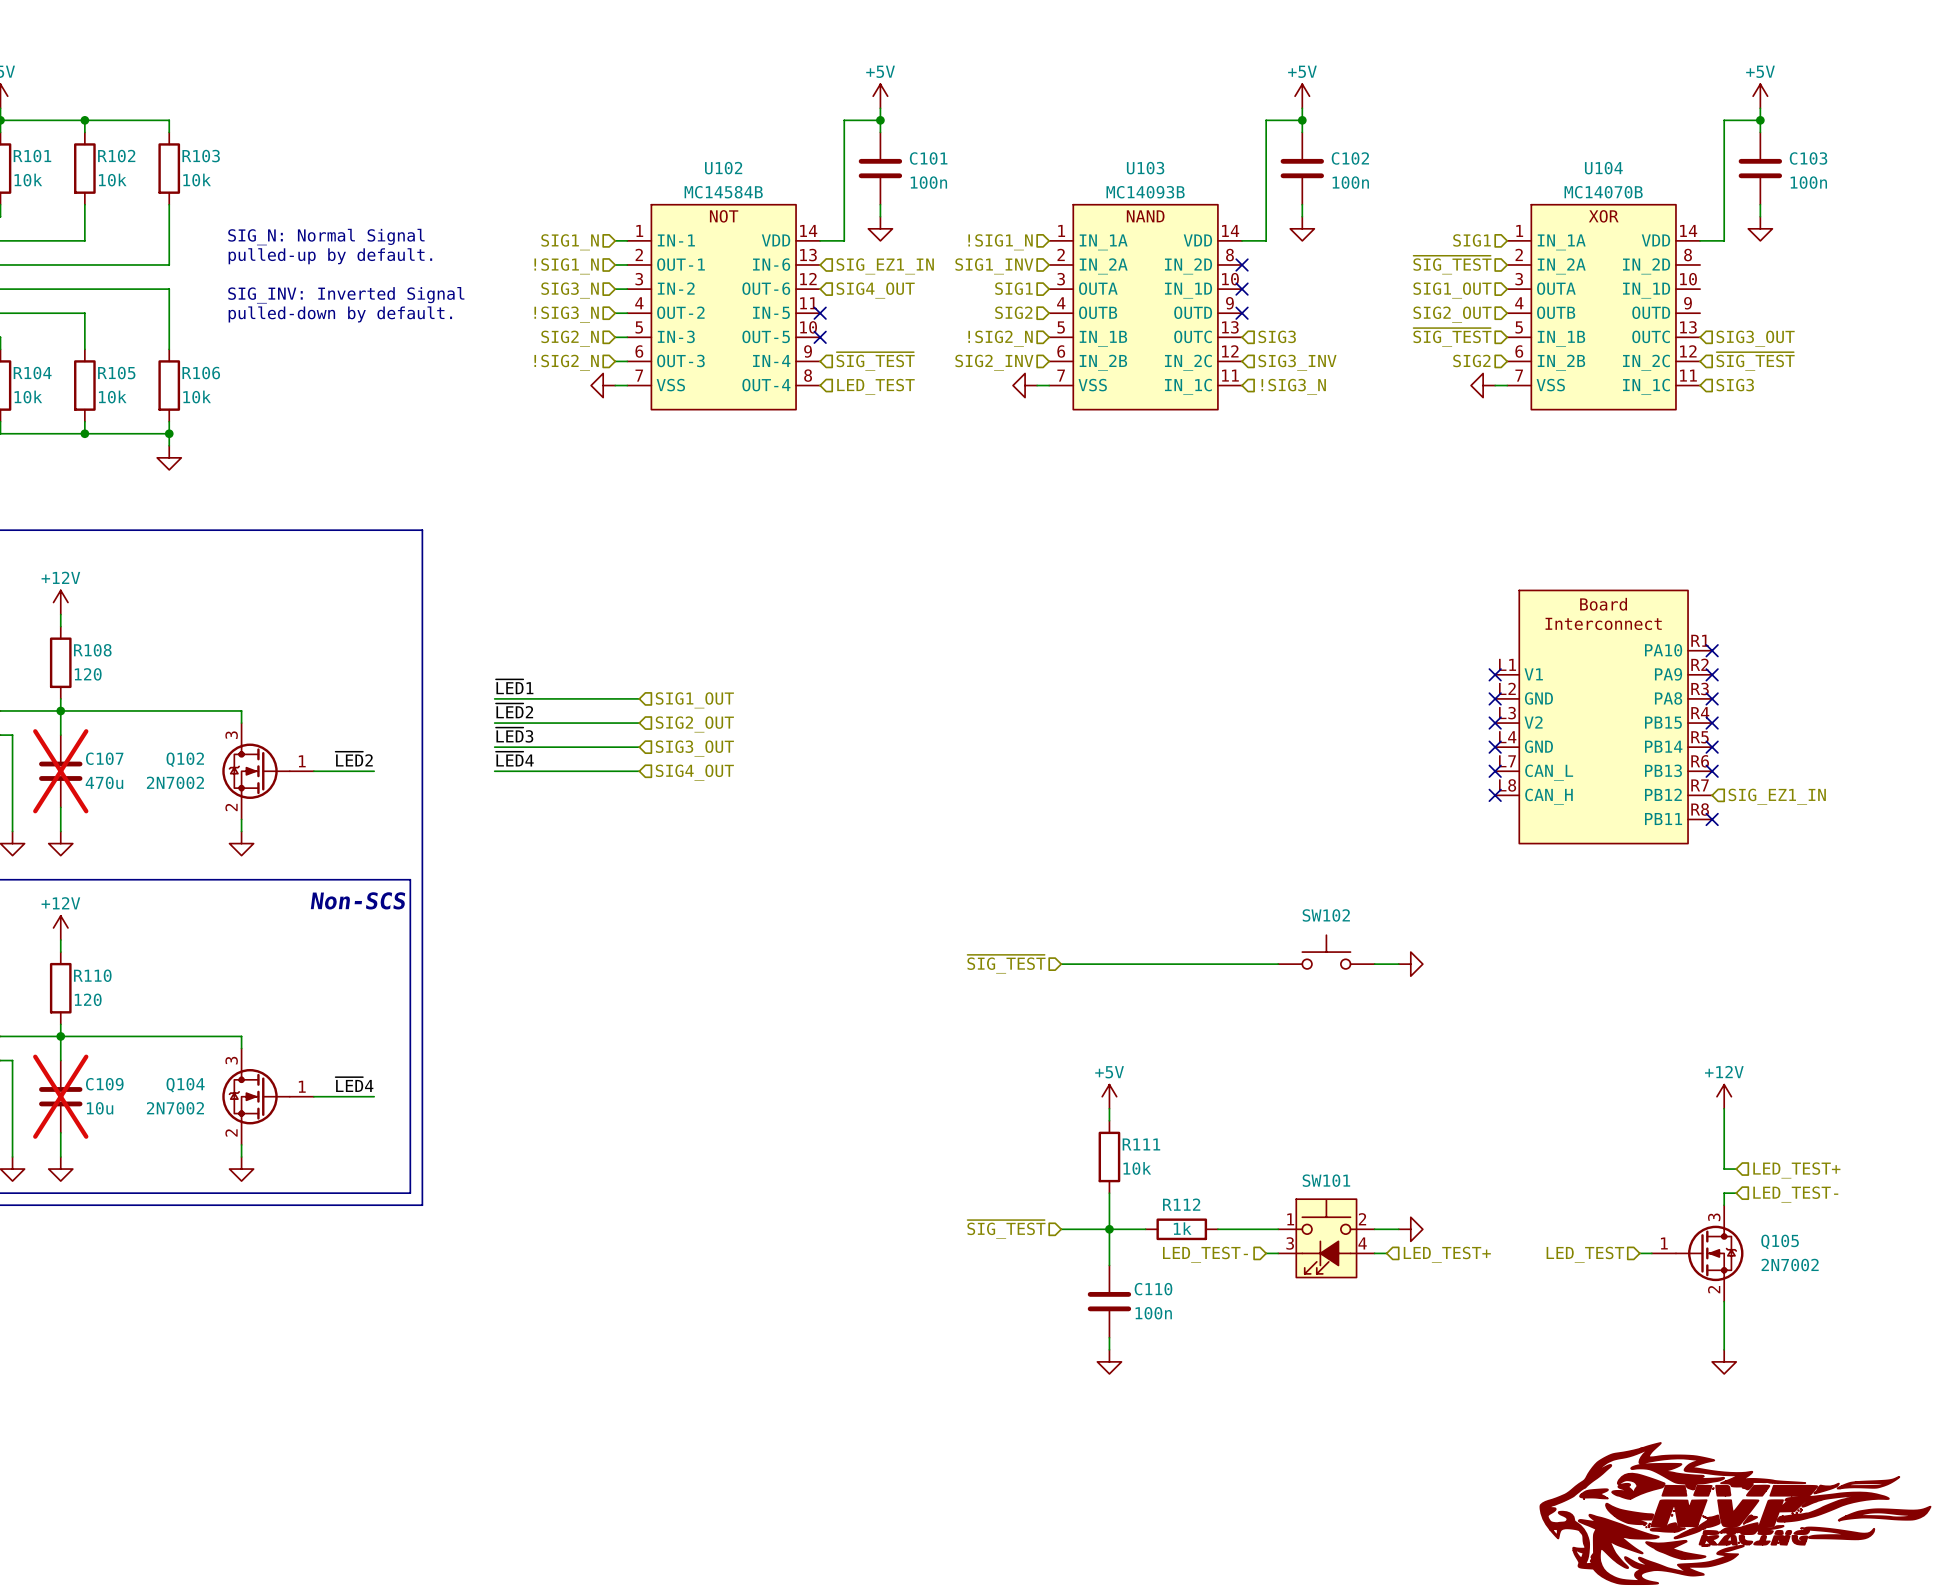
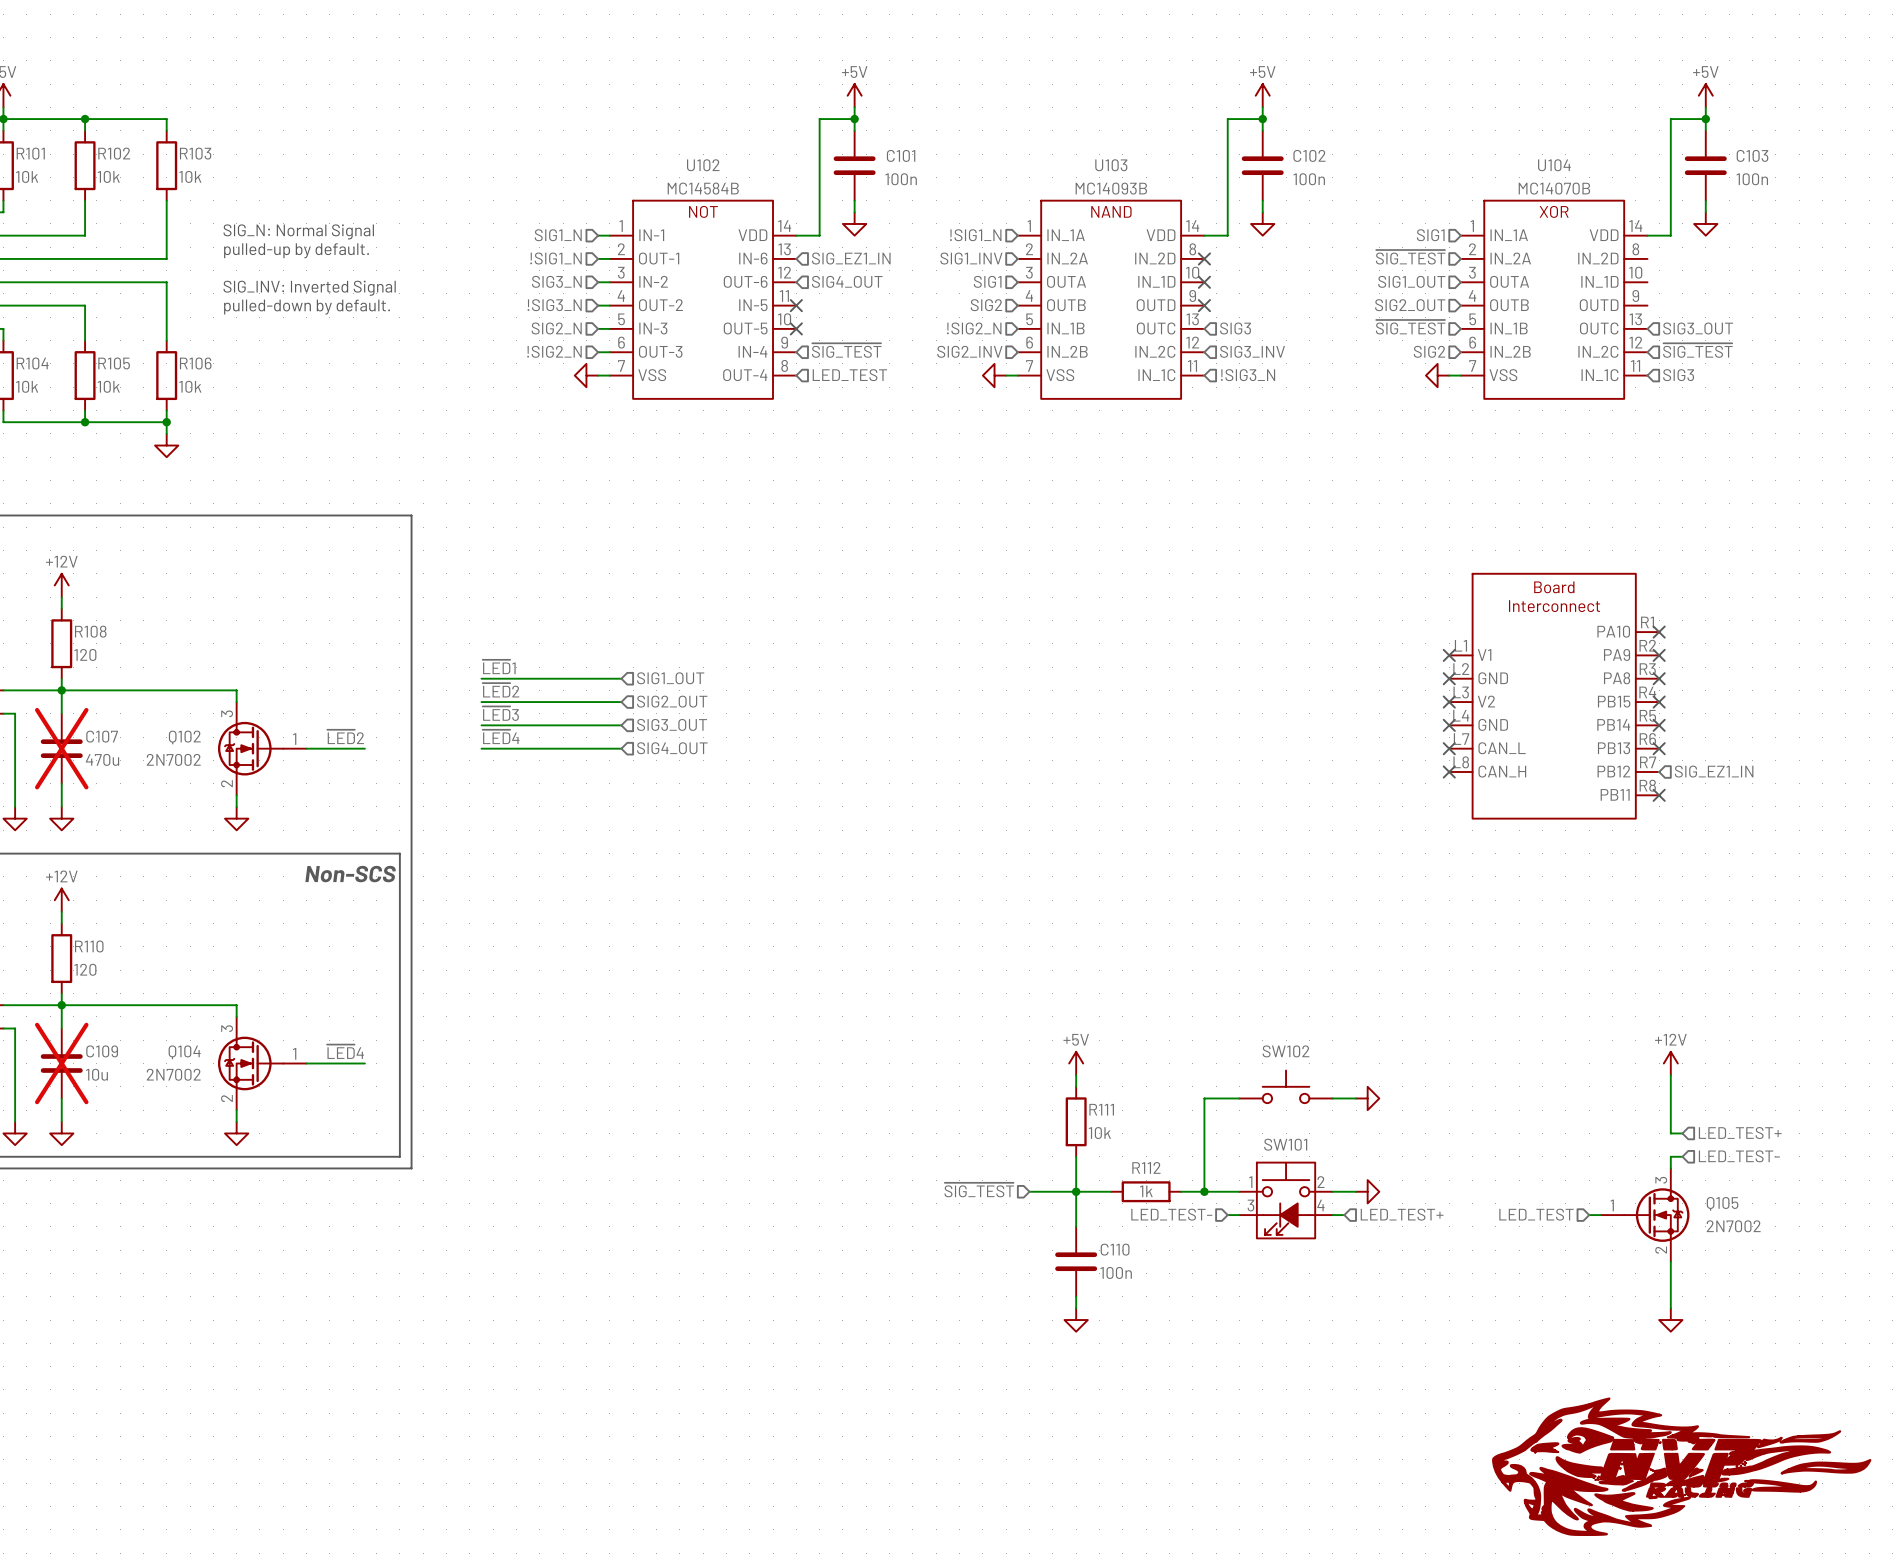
SW102 position: (1326, 952) -> (1286, 1086)
hierarchical label: ~{SIG_TEST} (1006, 964) -> none
wire: (1061, 964) (1278, 964) -> none
wire: (1374, 964) (1398, 964) -> (1332, 1098) (1356, 1098)
power symbol position: (1410, 964) -> (1367, 1098)
wire: none -> (1239, 1098) (1204, 1098) (1204, 1191)
junction: none -> (1204, 1191)

